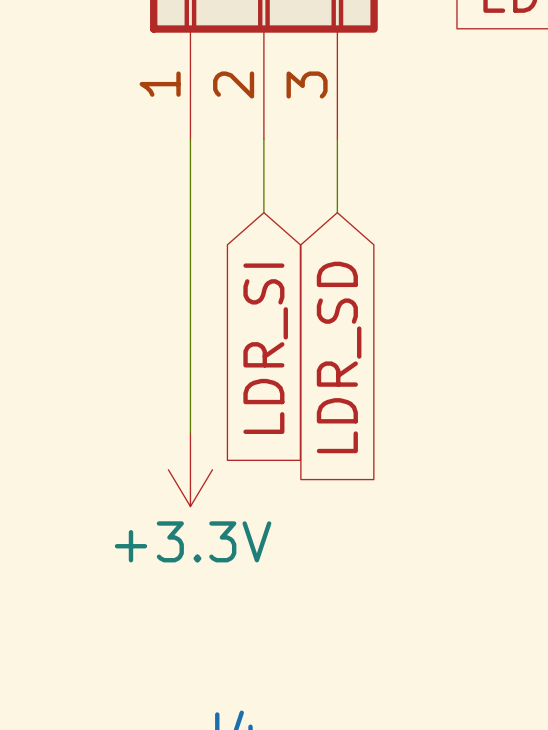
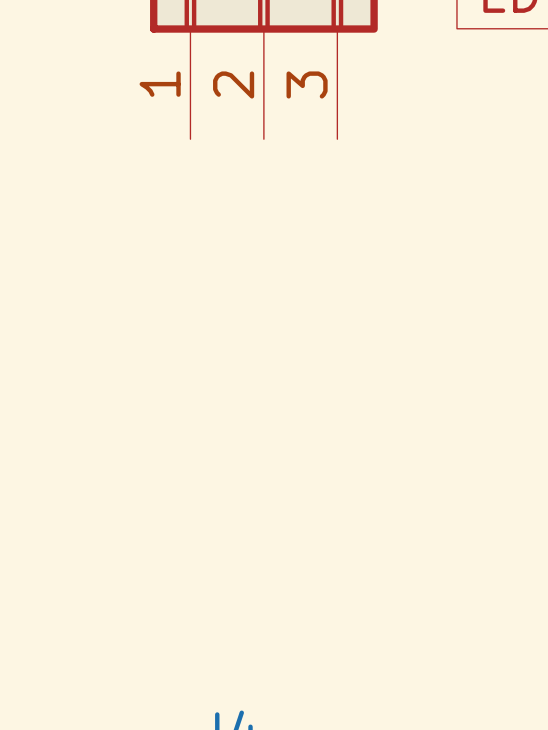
wire: (190, 139) (190, 433) -> none
wire: (263, 139) (263, 212) -> none
wire: (337, 139) (337, 212) -> none
global label: LDR_SI (265, 348) -> none
global label: LDR_SD (339, 357) -> none
power symbol: +3.3V (190, 469) -> none

